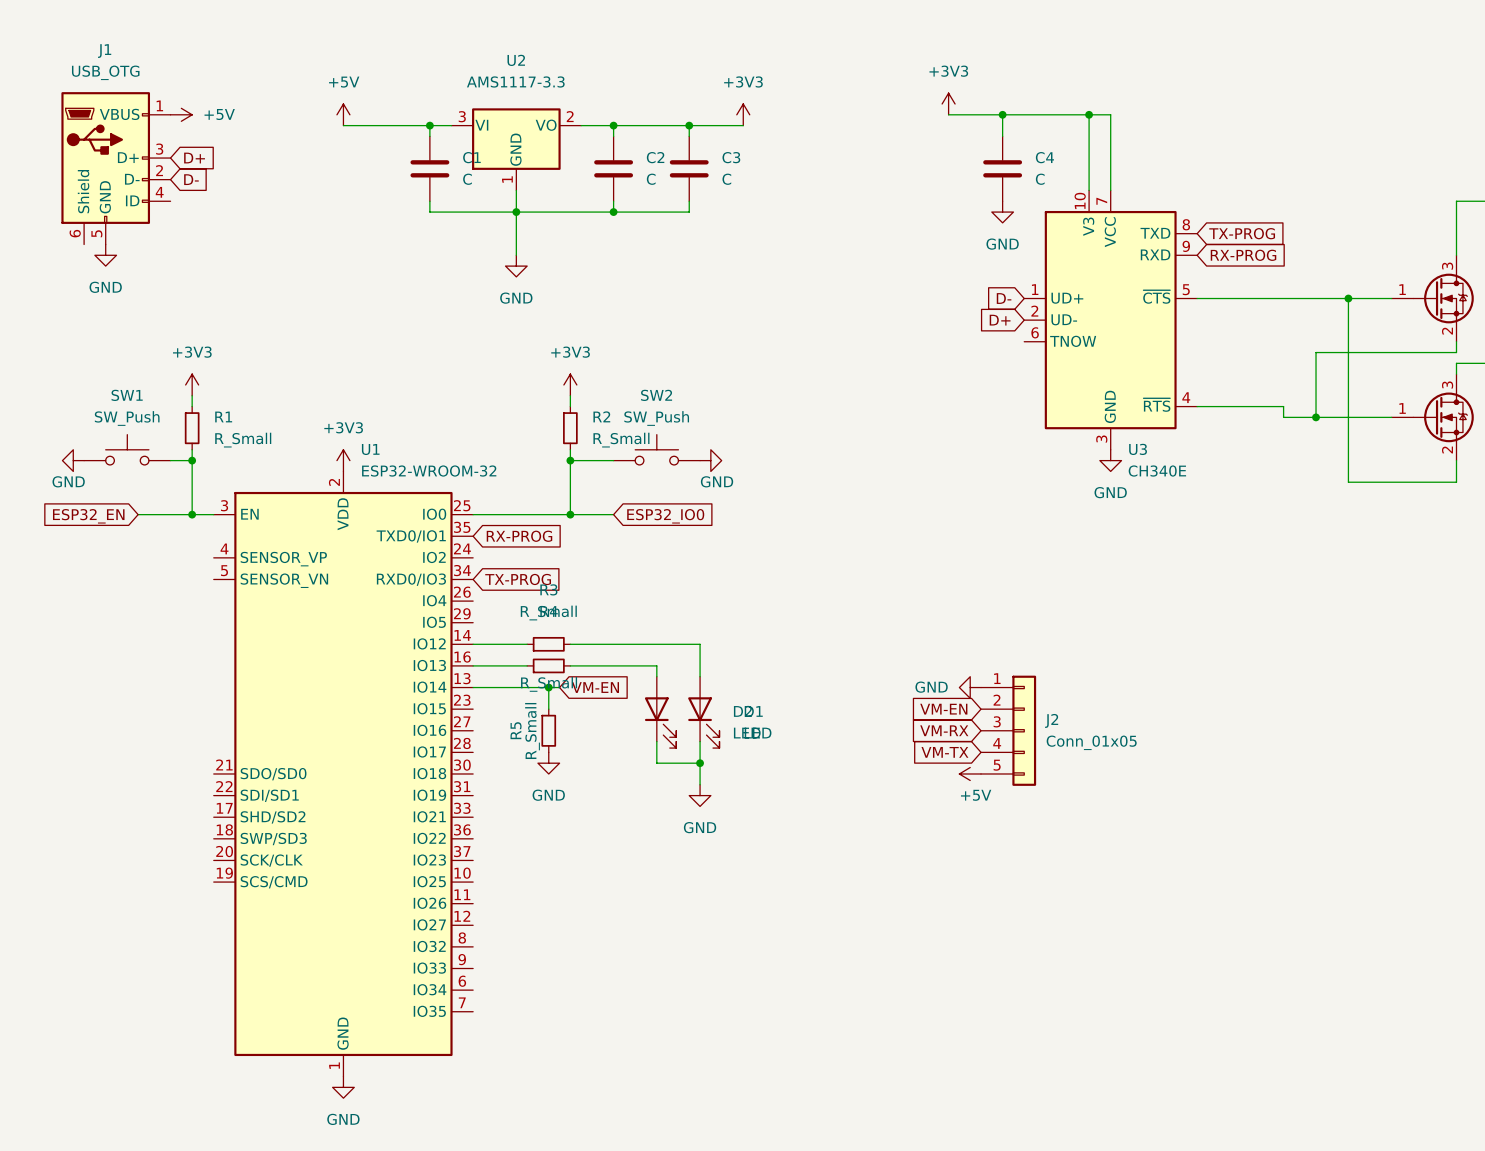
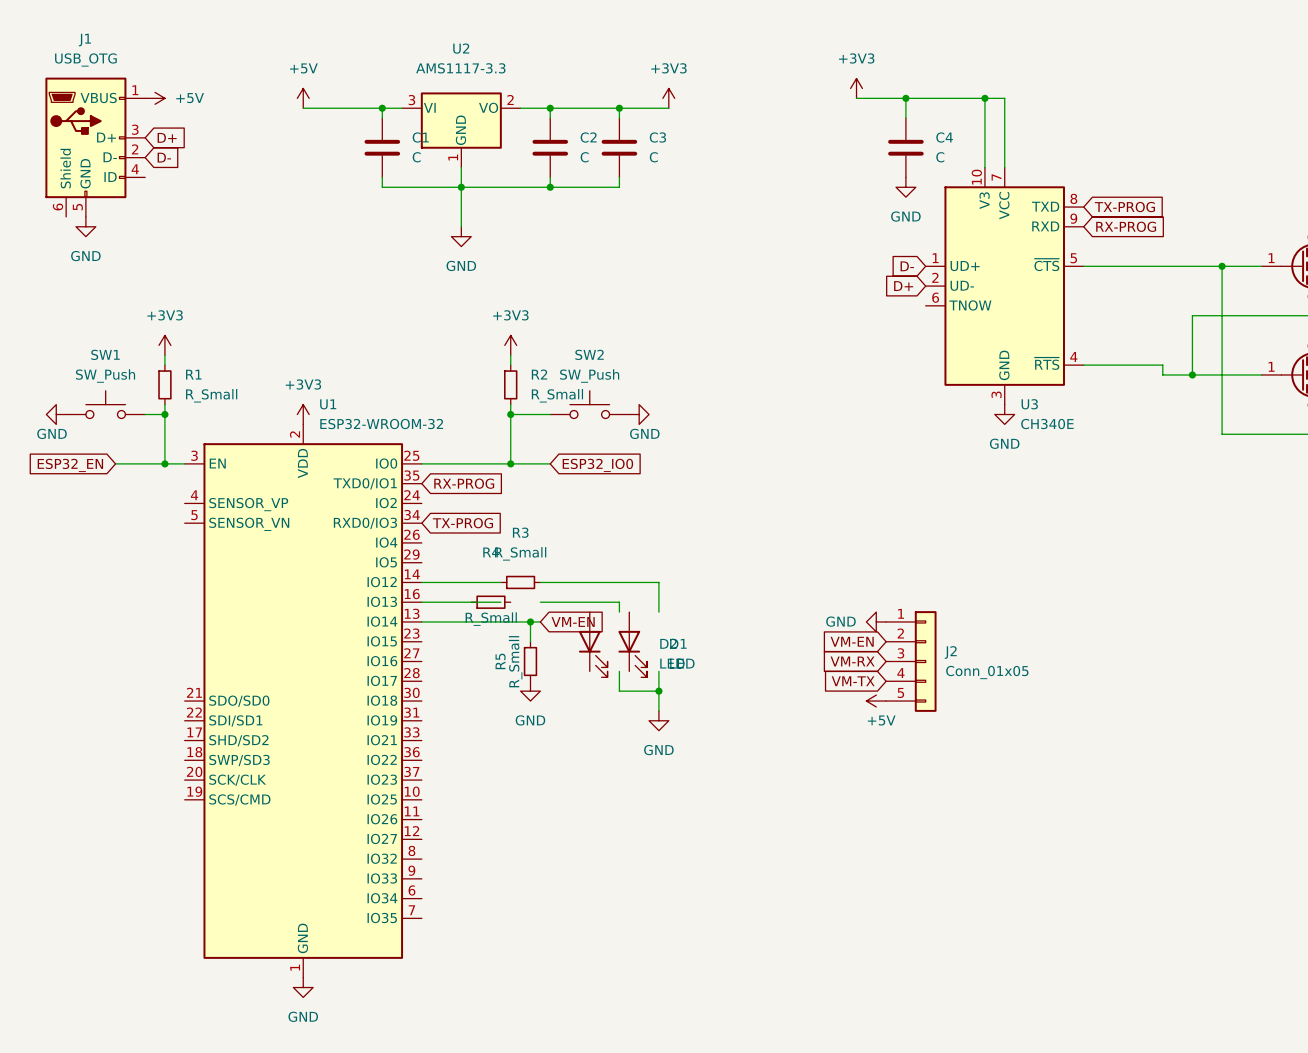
R3 position: (548, 644) -> (520, 582)
wire: (570, 644) (602, 644) -> (471, 582) (500, 582)
wire: (700, 644) (700, 676) -> (629, 582) (658, 582) (658, 612)
wire: (570, 665) (602, 665) -> (471, 602) (500, 602)
wire: (656, 665) (656, 676) -> (589, 602) (619, 602) (619, 612)
wire: (548, 687) (548, 709) -> (530, 621) (530, 641)
junction position: (548, 687) -> (530, 621)
wire: none -> (500, 621) (540, 621)
global label position: VM-EN (595, 687) -> VM-EN (573, 621)
R5 position: (548, 730) -> (530, 661)
wire: (656, 741) (656, 763) (689, 763) -> (619, 671) (619, 691)
wire: (700, 741) (700, 784) -> (658, 671) (658, 710)
power symbol position: GND (548, 763) -> GND (530, 691)
wire: none -> (629, 691) (658, 691)
junction position: (700, 763) -> (658, 691)
power symbol position: GND (700, 795) -> GND (658, 720)

